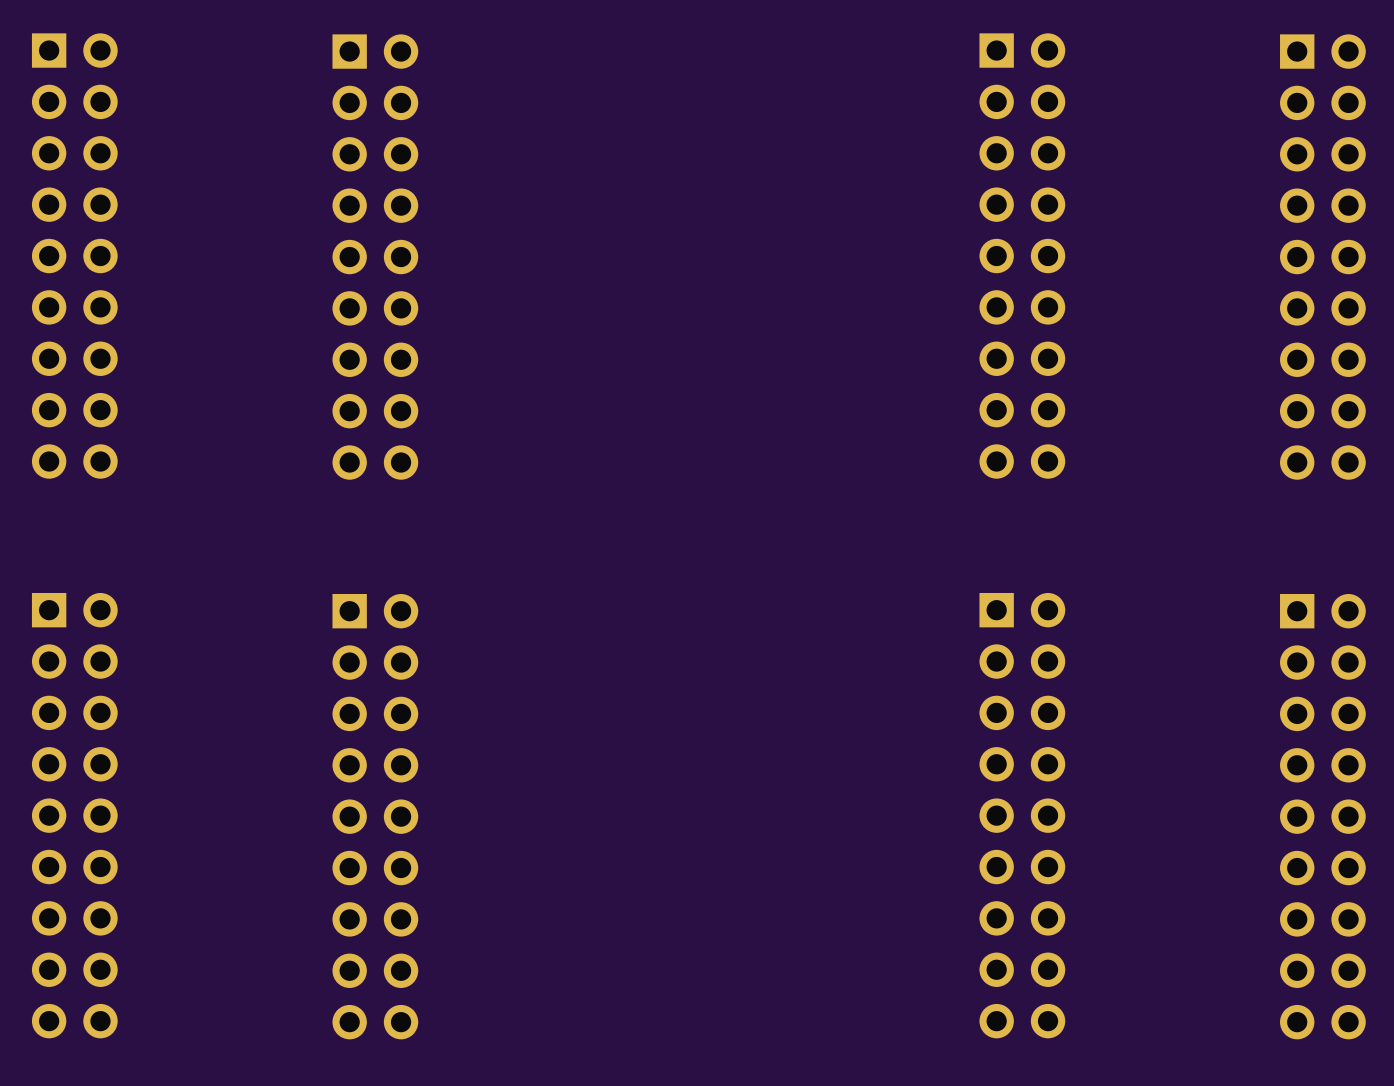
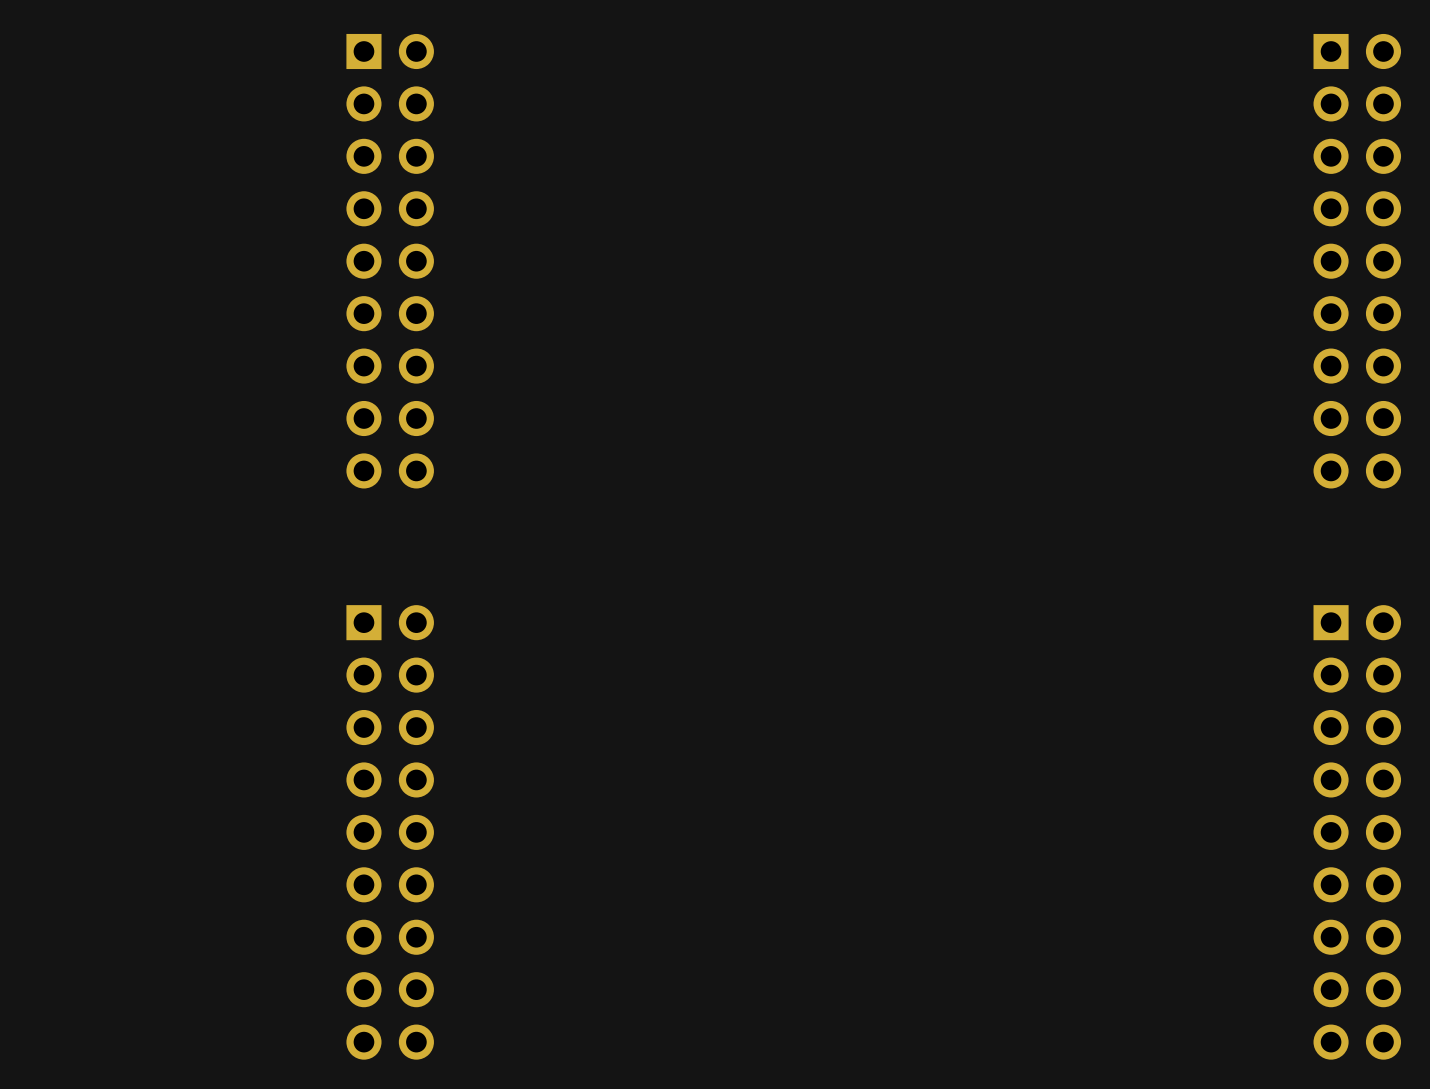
part: (74, 256) -> none
part: (1022, 256) -> none
part: (74, 815) -> none
part: (1022, 815) -> none

